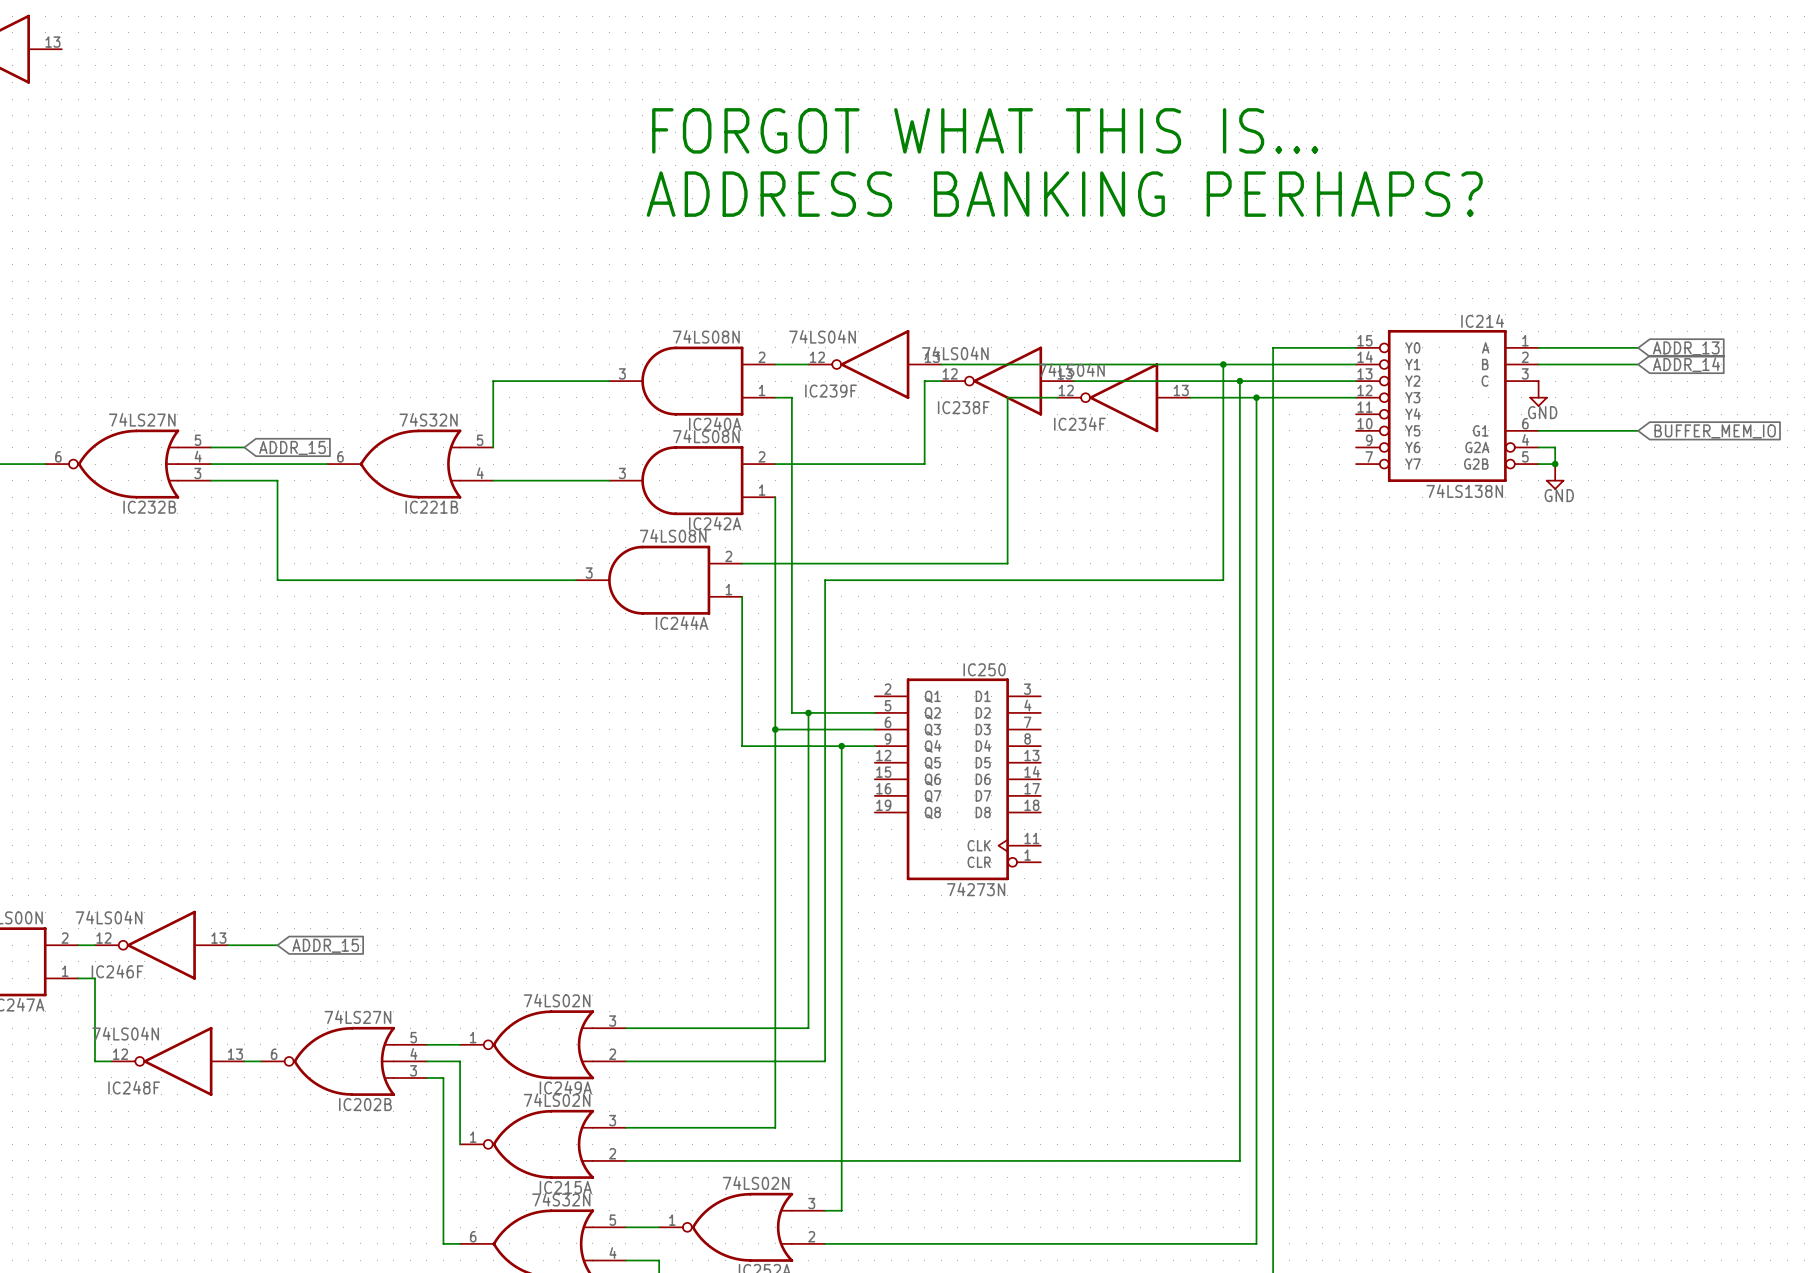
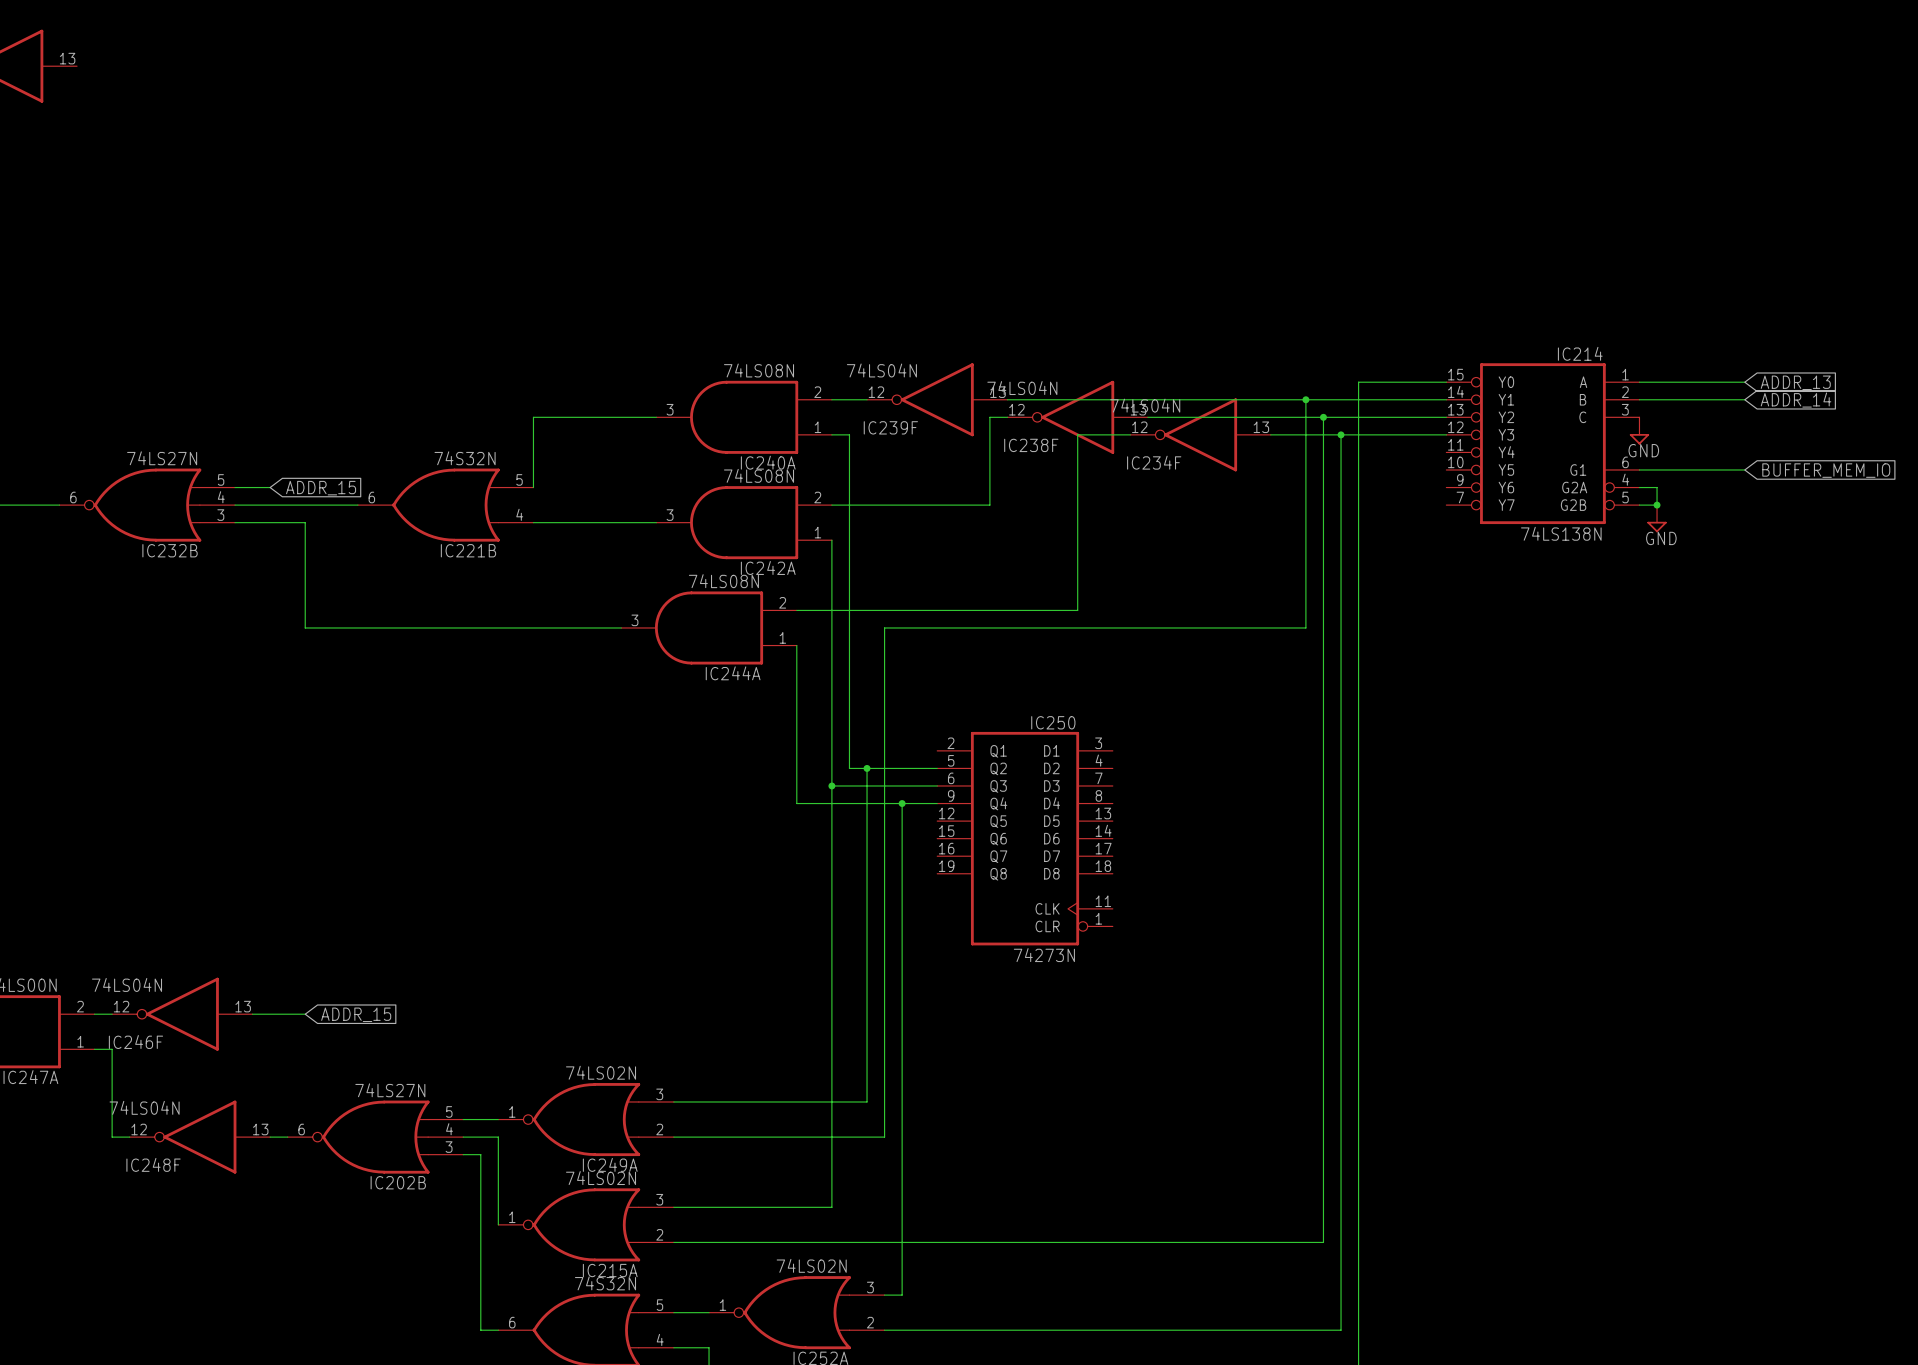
text: FORGOT WHAT THIS IS... (985, 130) -> none
text: ADDRESS BANKING PERHAPS? (1064, 194) -> none

